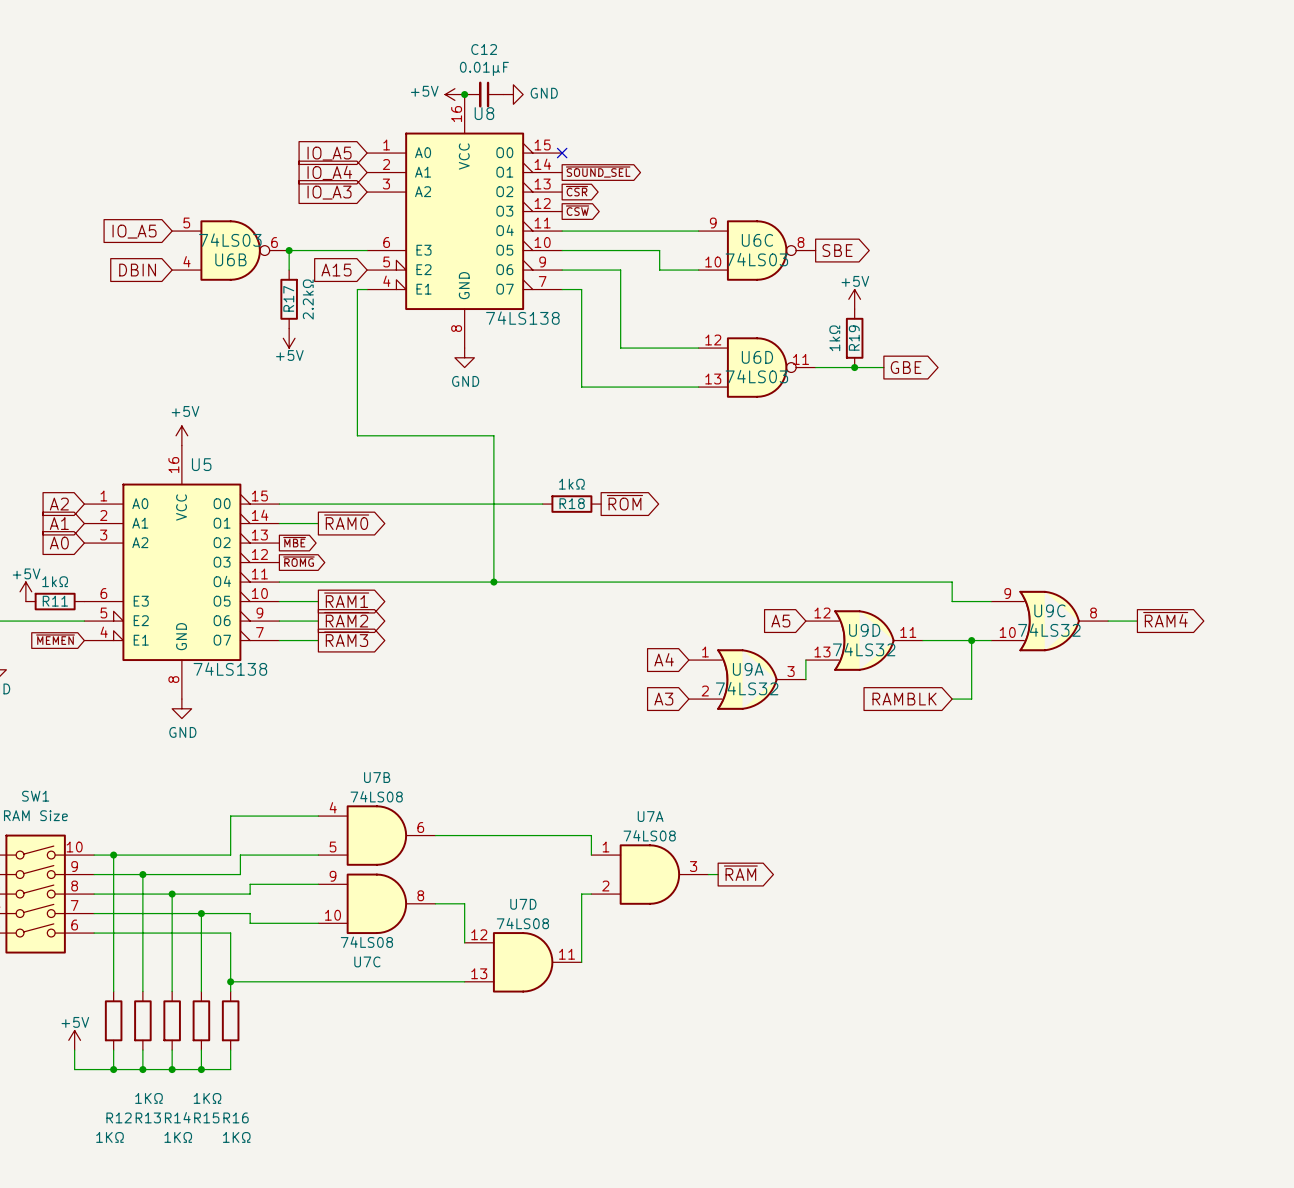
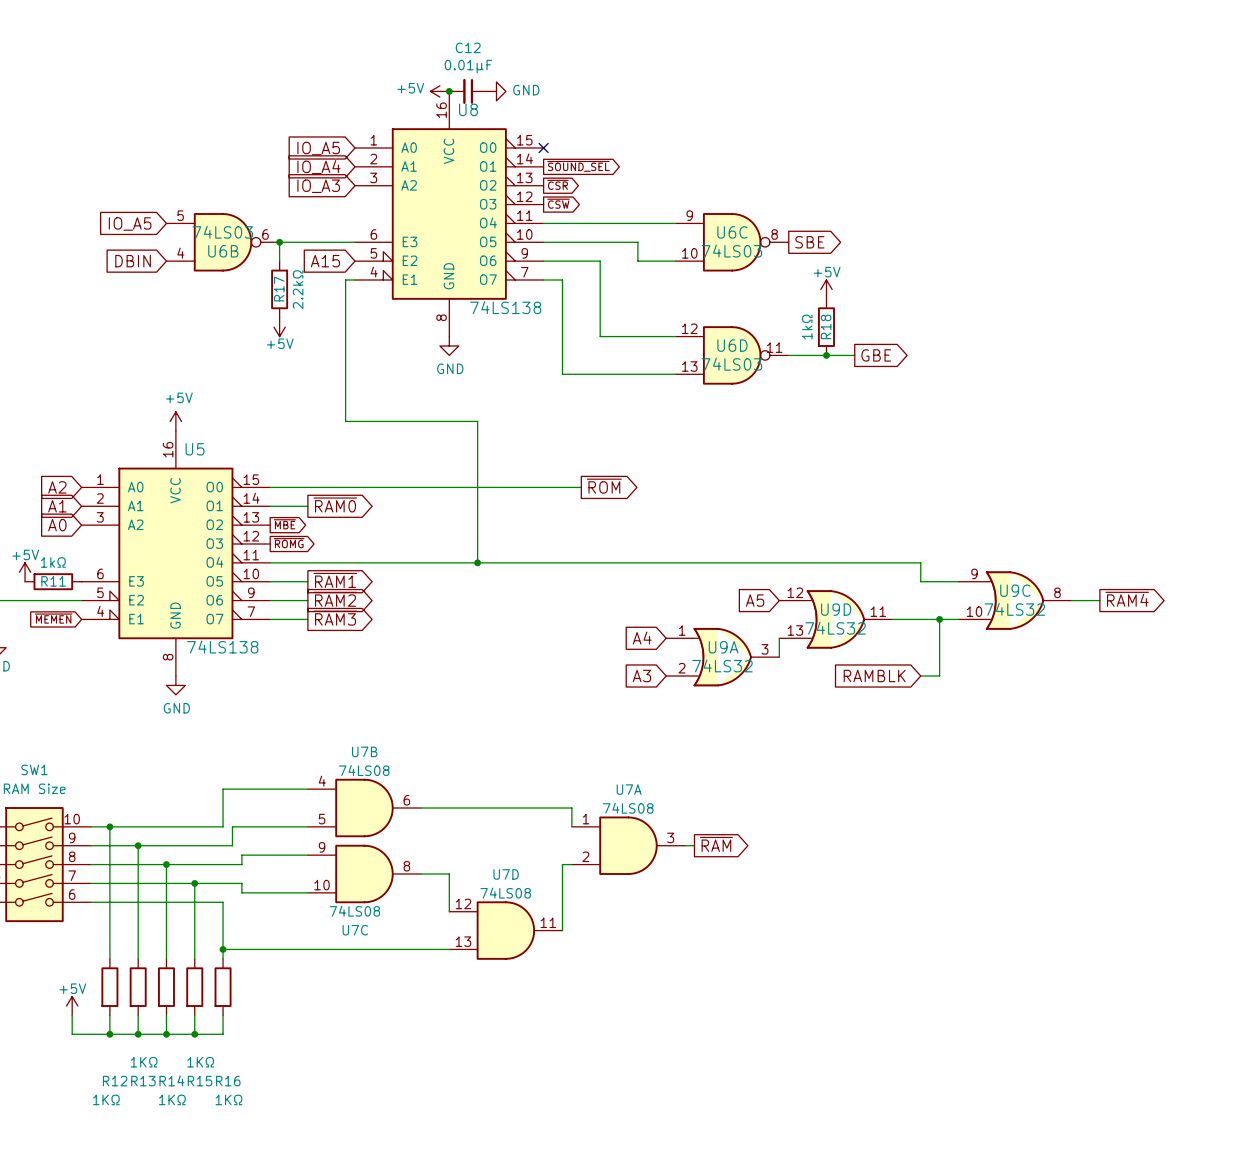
R19 name: R19 (854, 338) -> R18 (826, 326)
R18: 1kΩ (571, 504) -> none

